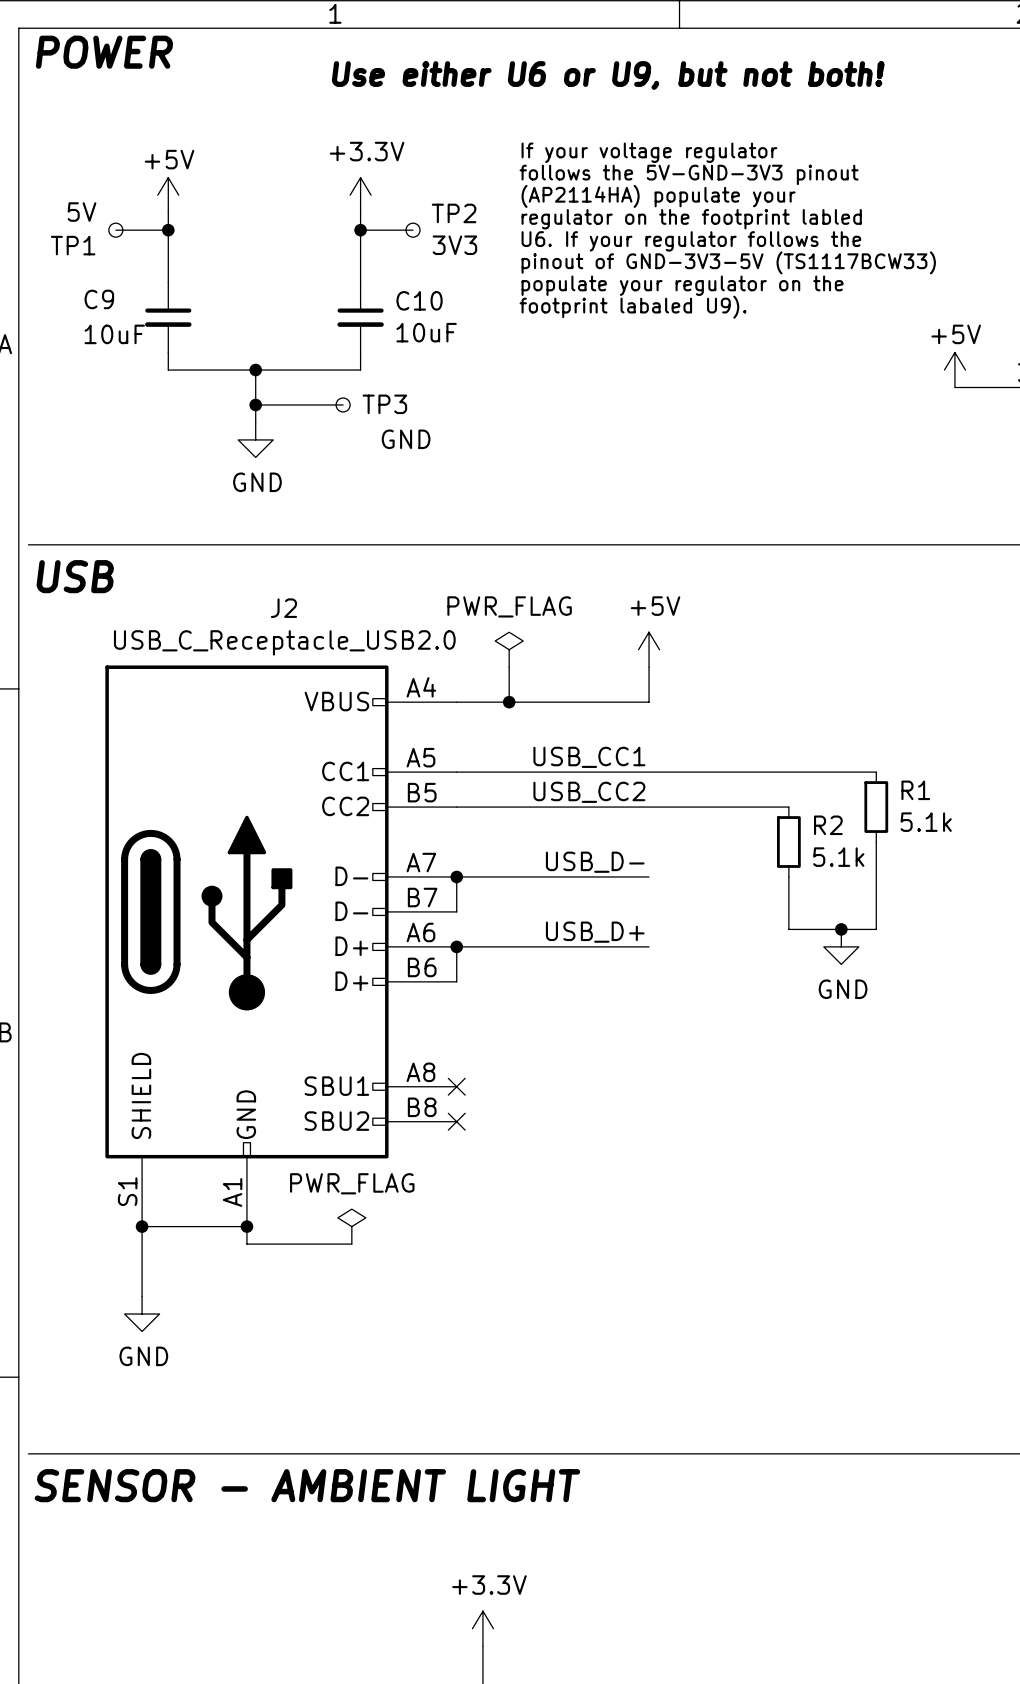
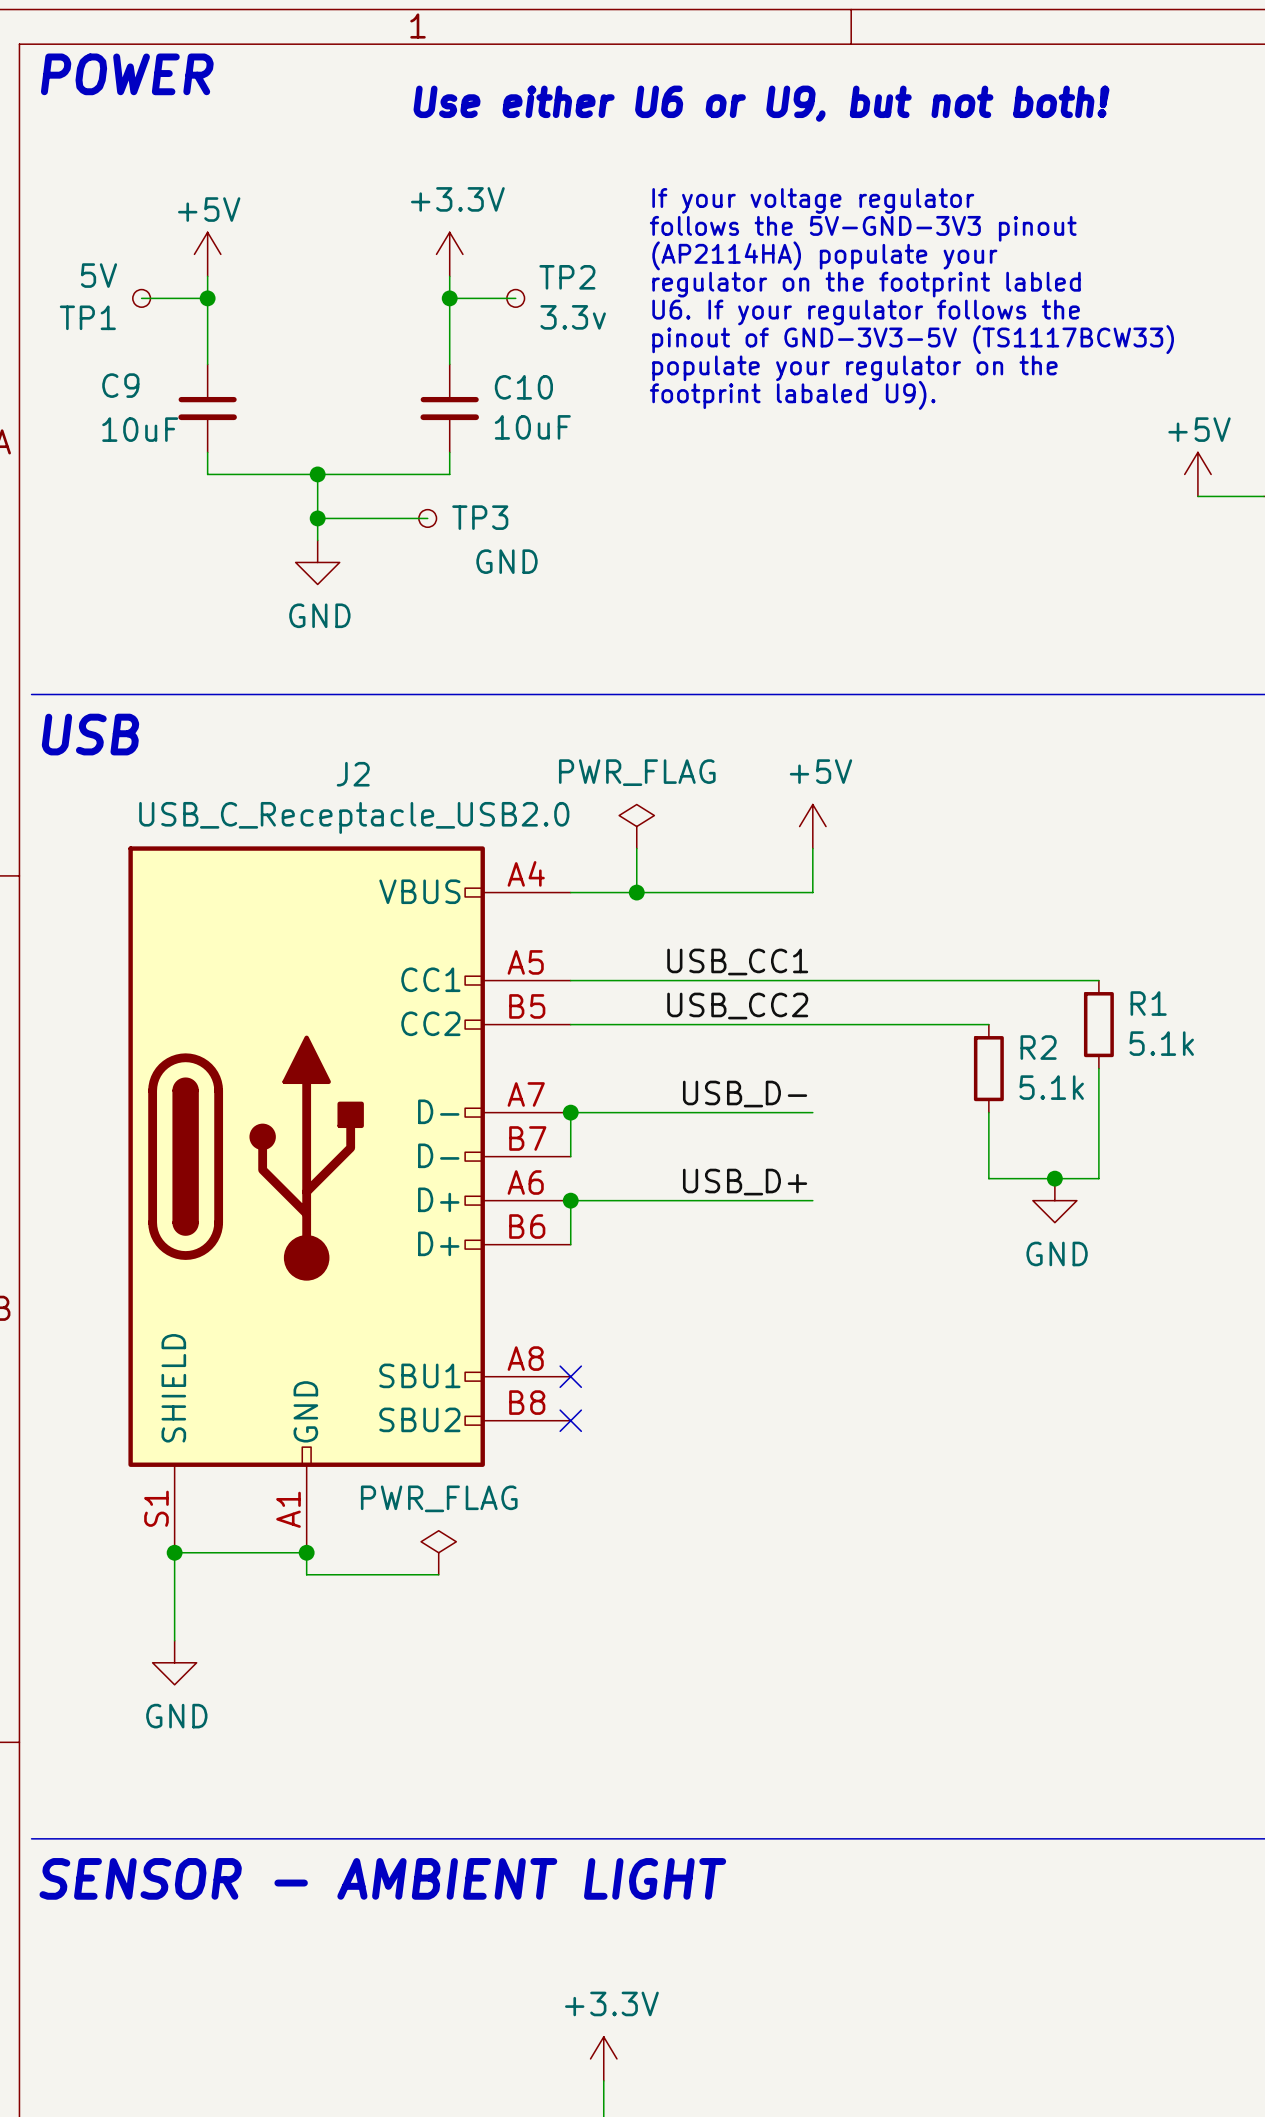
TP2 value: 3V3 (454, 245) -> 3.3v (573, 317)

